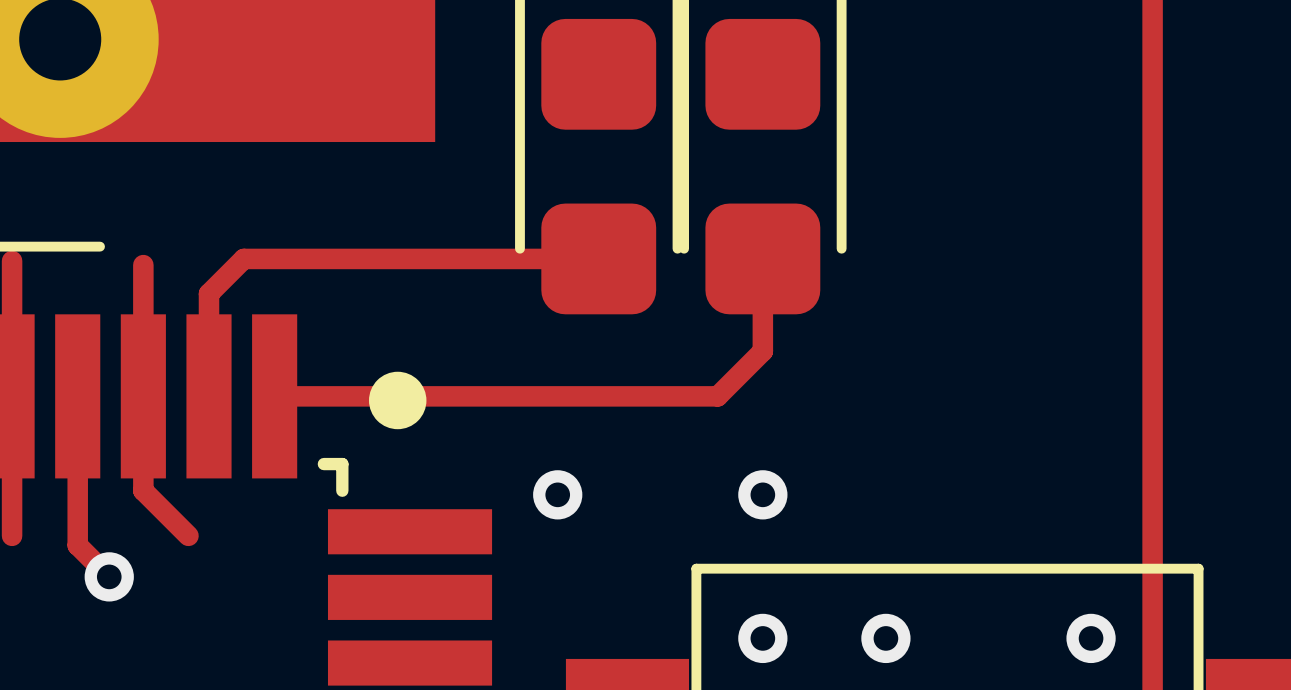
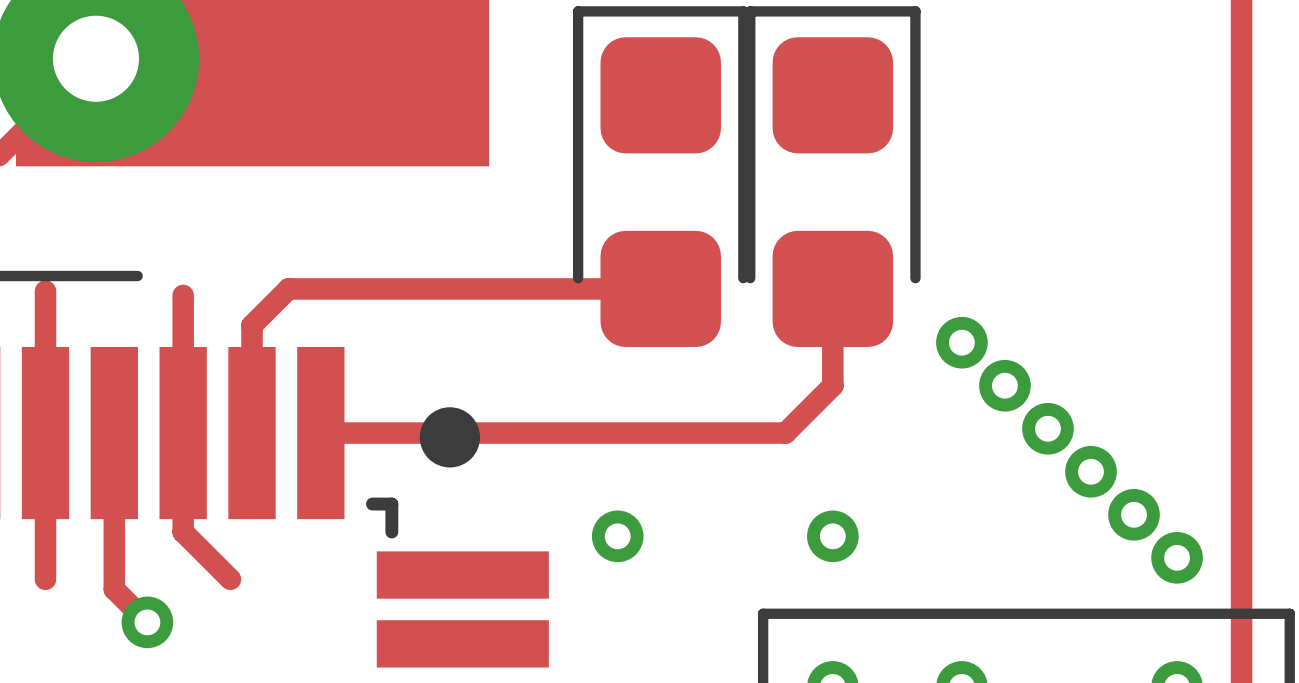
via: none -> (961, 342)
via: none -> (1004, 385)
via: none -> (1047, 428)
via: none -> (1090, 471)
via: none -> (1134, 514)
via: none -> (1177, 557)

